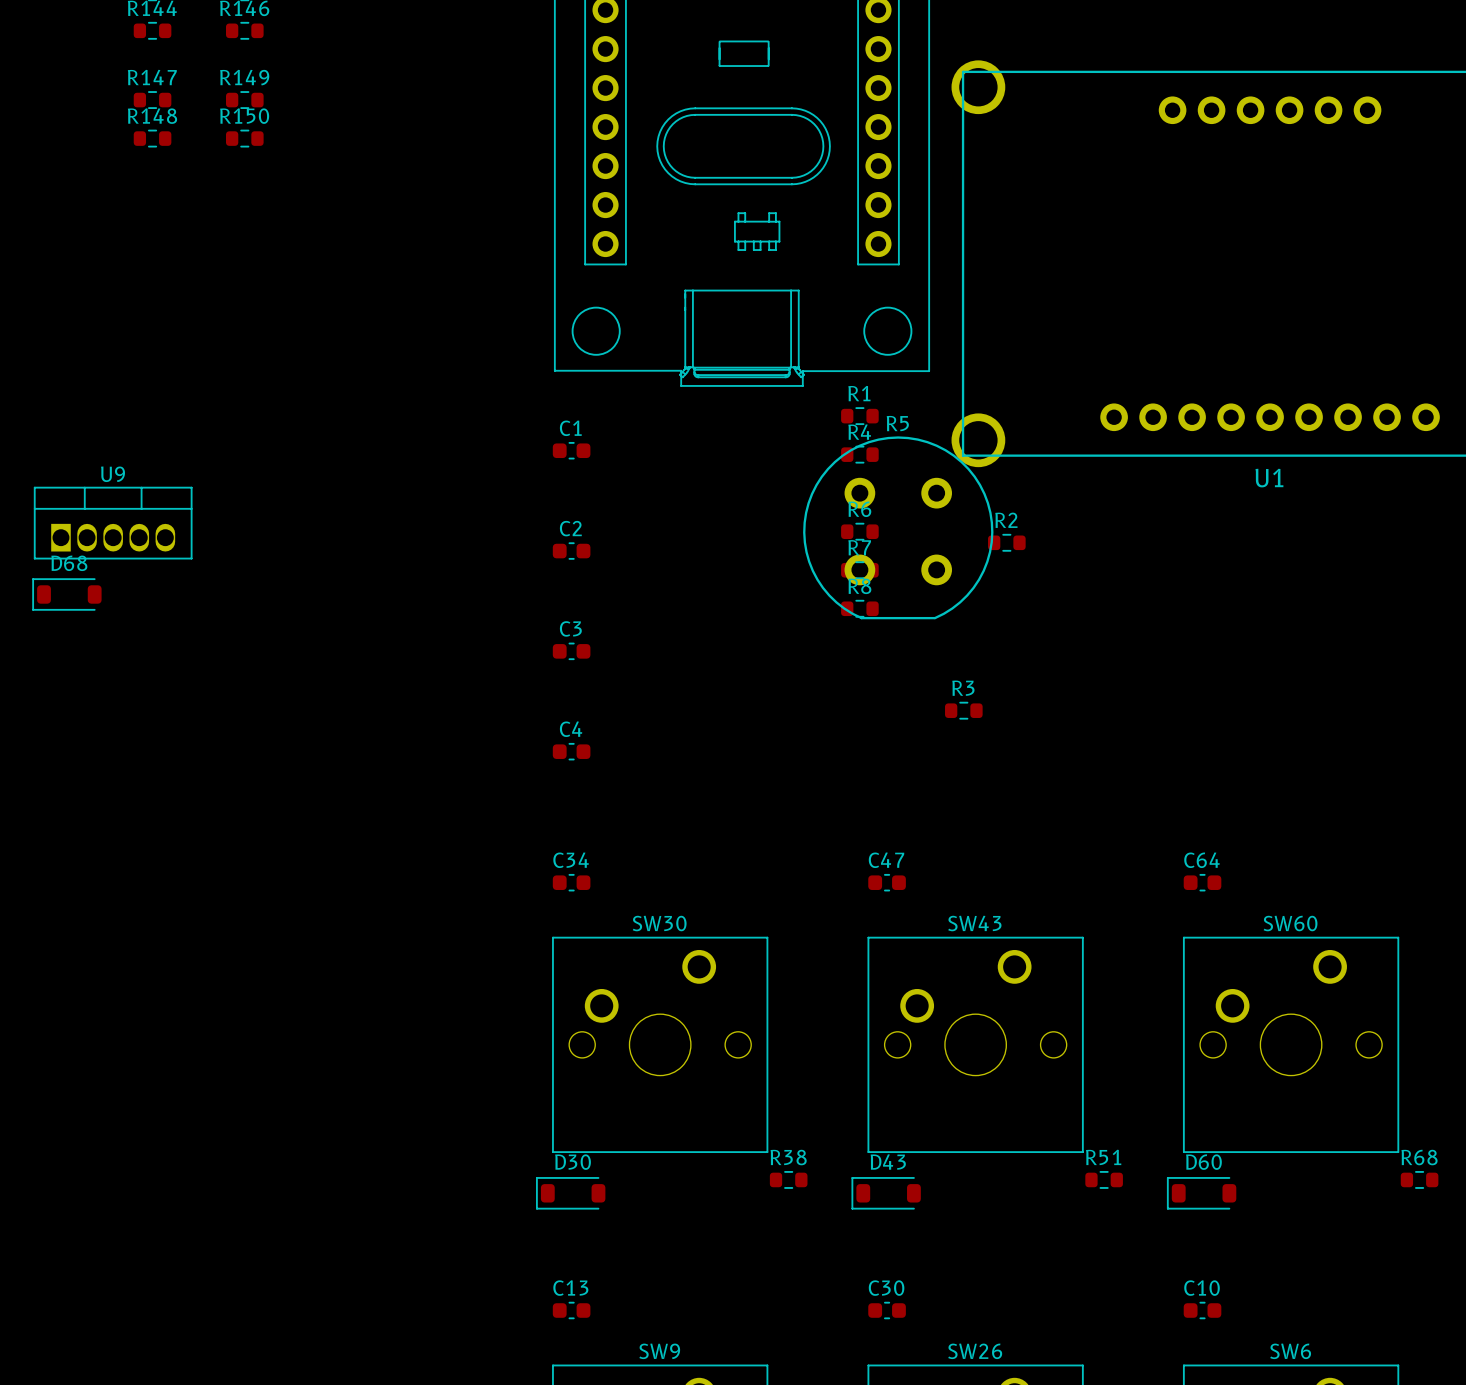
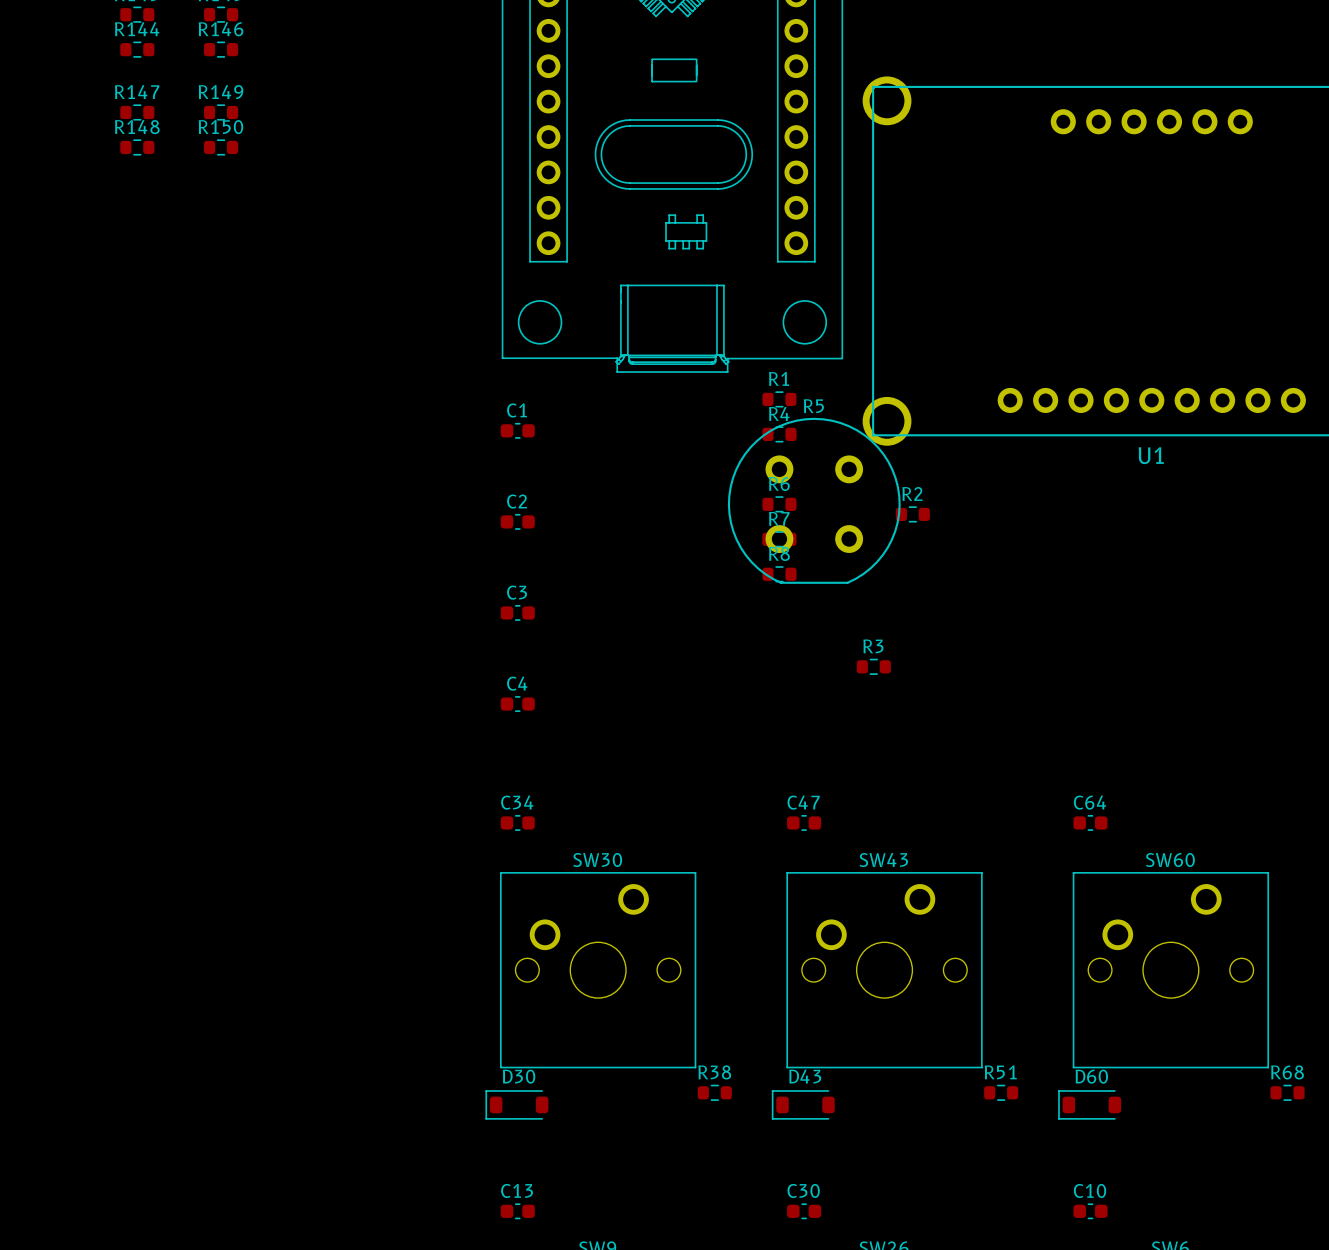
U9: (113, 523) -> none
D68: (66, 594) -> none

